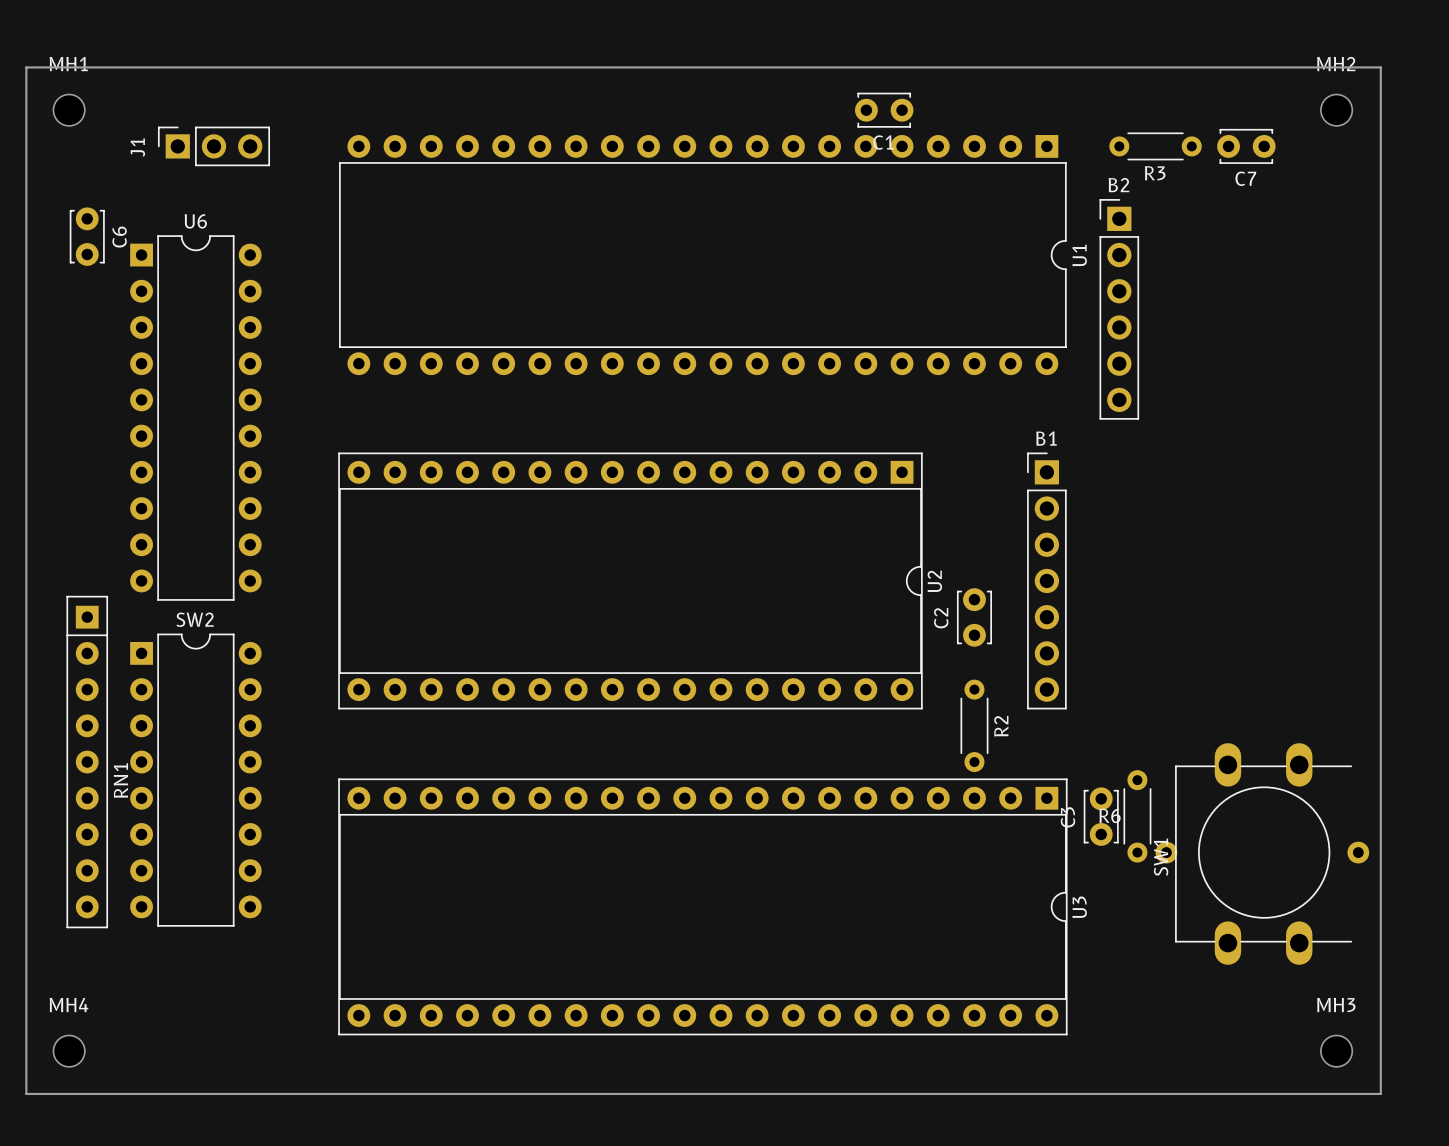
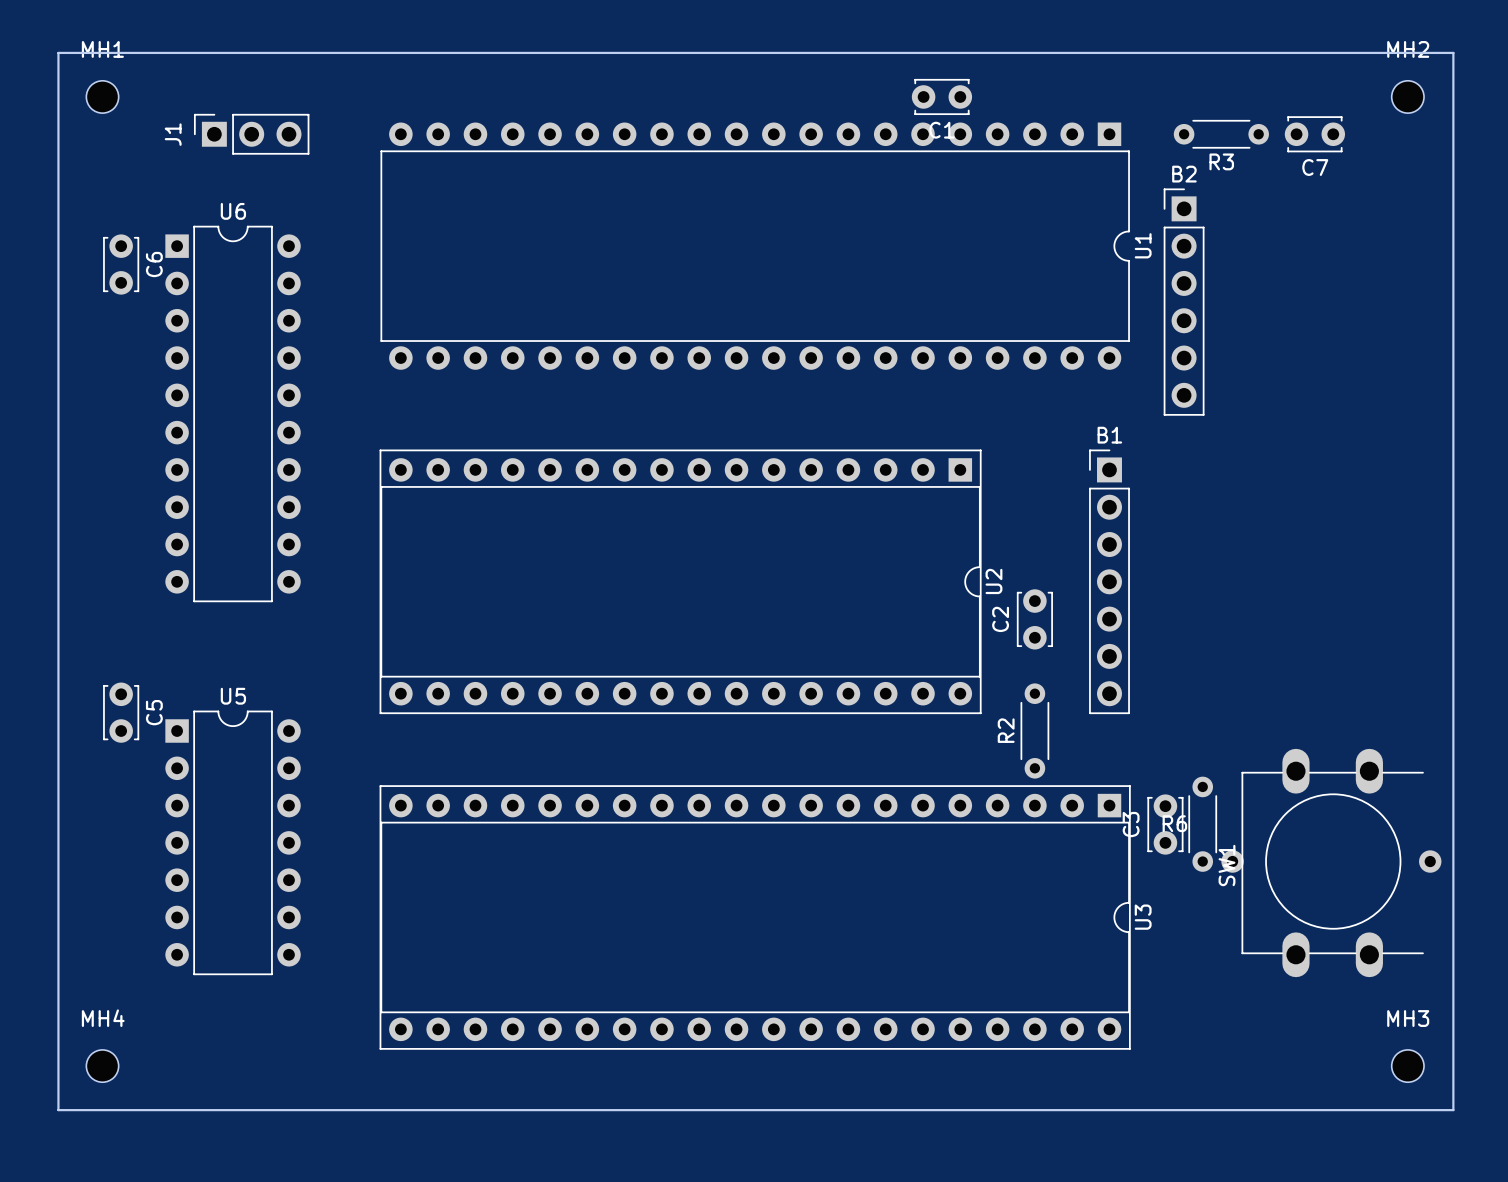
C6 position: (87, 236) -> (121, 264)
C5: none -> (121, 712)
R2 name position: R2 (1001, 726) -> R2 (1006, 730)
RN1: (87, 762) -> none
SW2: (195, 780) -> none
U5: none -> (233, 842)

